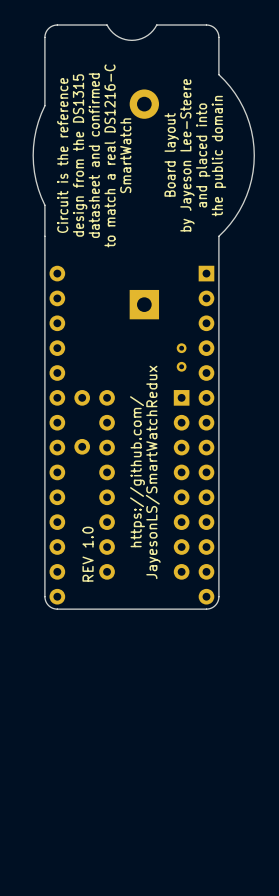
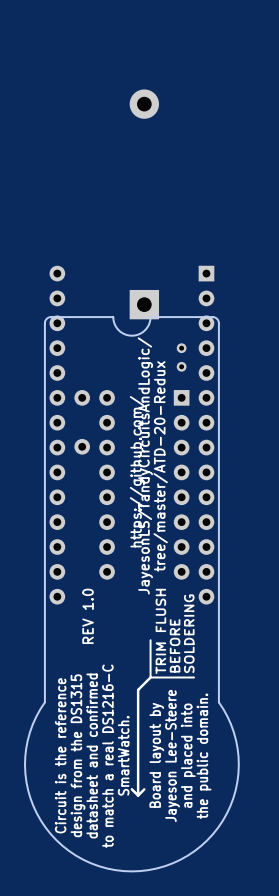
text: Board layout (171, 154) -> none
text: Circuit is the reference (62, 155) -> none
text: design from the DS1315 (80, 155) -> none
text: datasheet and confirmed (94, 155) -> none
text: to match a real DS1216-C (110, 155) -> none
text: SmartWatch (125, 155) -> none
text: by Jayeson Lee-Steere (187, 155) -> none
text: and placed into (203, 155) -> none
text: the public domain (218, 156) -> none
board edge: (218, 323) (218, 236) (235, 217) (246, 195) (253, 171) (253, 147) (251, 130) (243, 107) (230, 86) (218, 74) (217, 32) (212, 26) (206, 25) (156, 25) (145, 37) (131, 40) (118, 37) (107, 25) (55, 25) (46, 31) (44, 37) (44, 105) (36, 129) (33, 155) (36, 181) (44, 205) (44, 323) -> (218, 323) (217, 318) (213, 317) (150, 317) (145, 330) (131, 335) (118, 330) (113, 317) (50, 317) (46, 318) (44, 323)
text: none -> JayesonLS/TandyCircuitsAndLogic/ (145, 465)
text: none -> tree/master/ATD-20-Redux (160, 466)
text: JayesonLS/SmartWatchRedux (153, 472) -> none
text position: REV 1.0 (88, 554) -> REV 1.0 (88, 616)
board edge: none -> (44, 596) (44, 702)
board edge: (218, 596) (215, 605) (206, 609) (55, 609) (47, 604) (44, 596) -> (218, 596) (218, 702)
text: none -> TRIM FLUSH (160, 631)
text: none -> SOLDERING (189, 633)
line: none -> (150, 640) (150, 677)
text: none -> BEFORE (175, 645)
line: none -> (150, 677) (138, 689) (138, 795)
line: none -> (194, 677) (150, 677)
board edge: none -> (218, 702) (233, 732) (238, 756) (235, 789) (226, 813) (207, 840) (187, 855) (156, 868) (131, 871) (107, 868) (76, 855) (50, 834) (36, 813) (26, 781) (25, 756) (32, 724) (44, 702)
text: none -> Circuit is the reference (60, 755)
text: none -> design from the DS1315 (78, 755)
text: none -> SmartWatch. (123, 755)
text: none -> Board layout by (156, 755)
text: none -> and placed into (188, 755)
text: none -> datasheet and confirmed (92, 756)
text: none -> to match a real DS1216-C (107, 756)
text: none -> Jayeson Lee-Steere (172, 756)
text: none -> the public domain. (204, 756)
line: none -> (144, 789) (138, 795)
line: none -> (138, 795) (131, 789) (138, 795)

